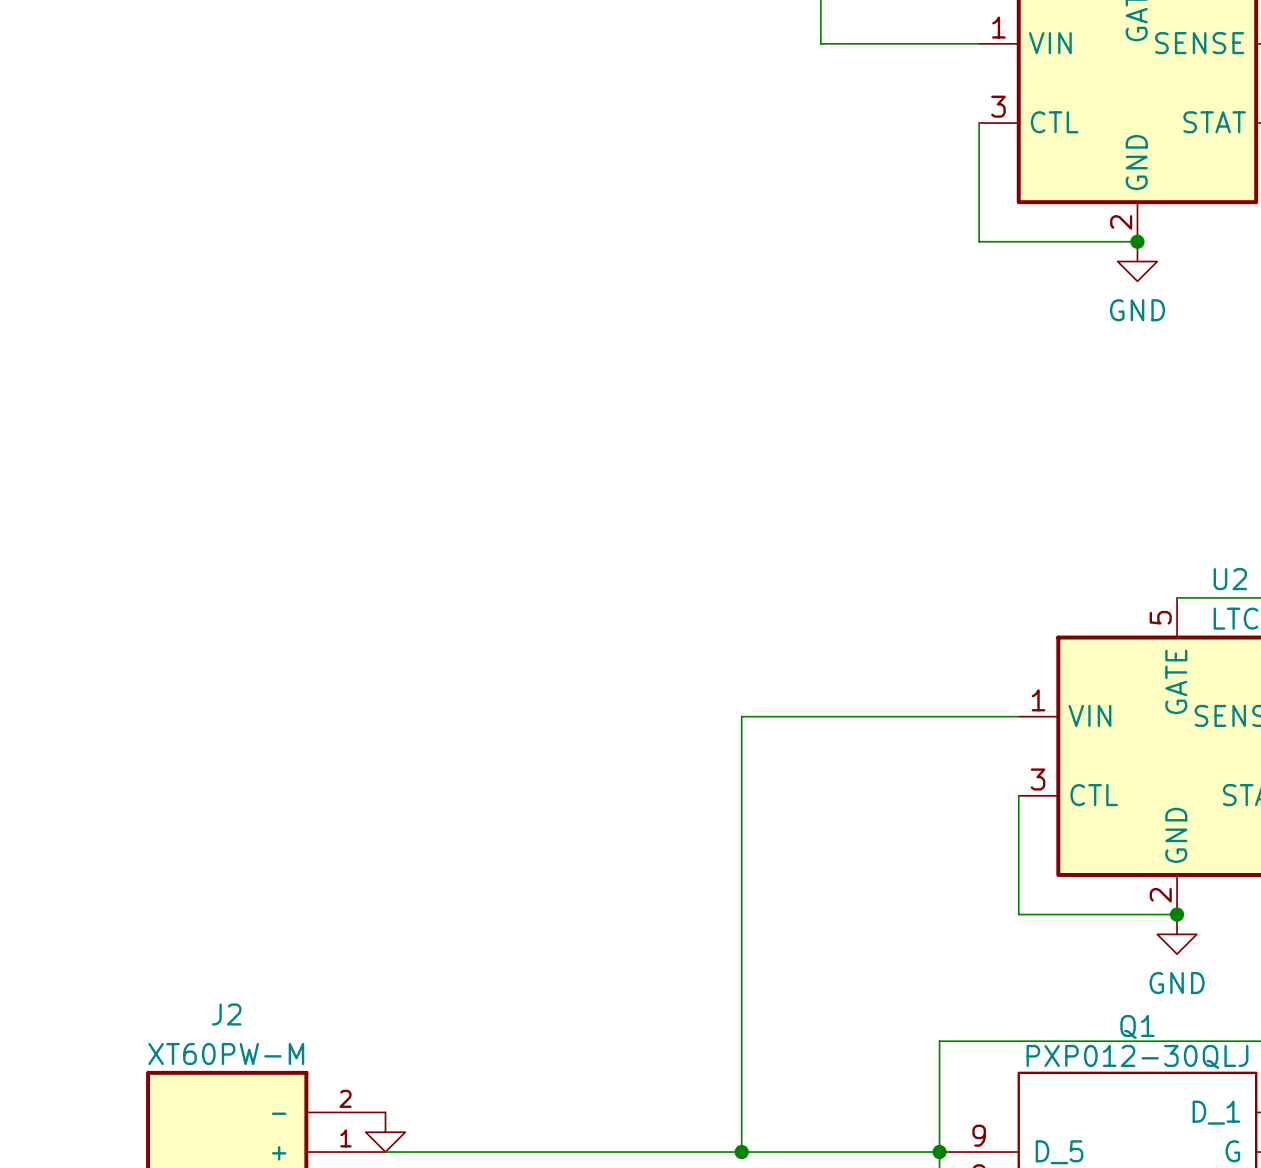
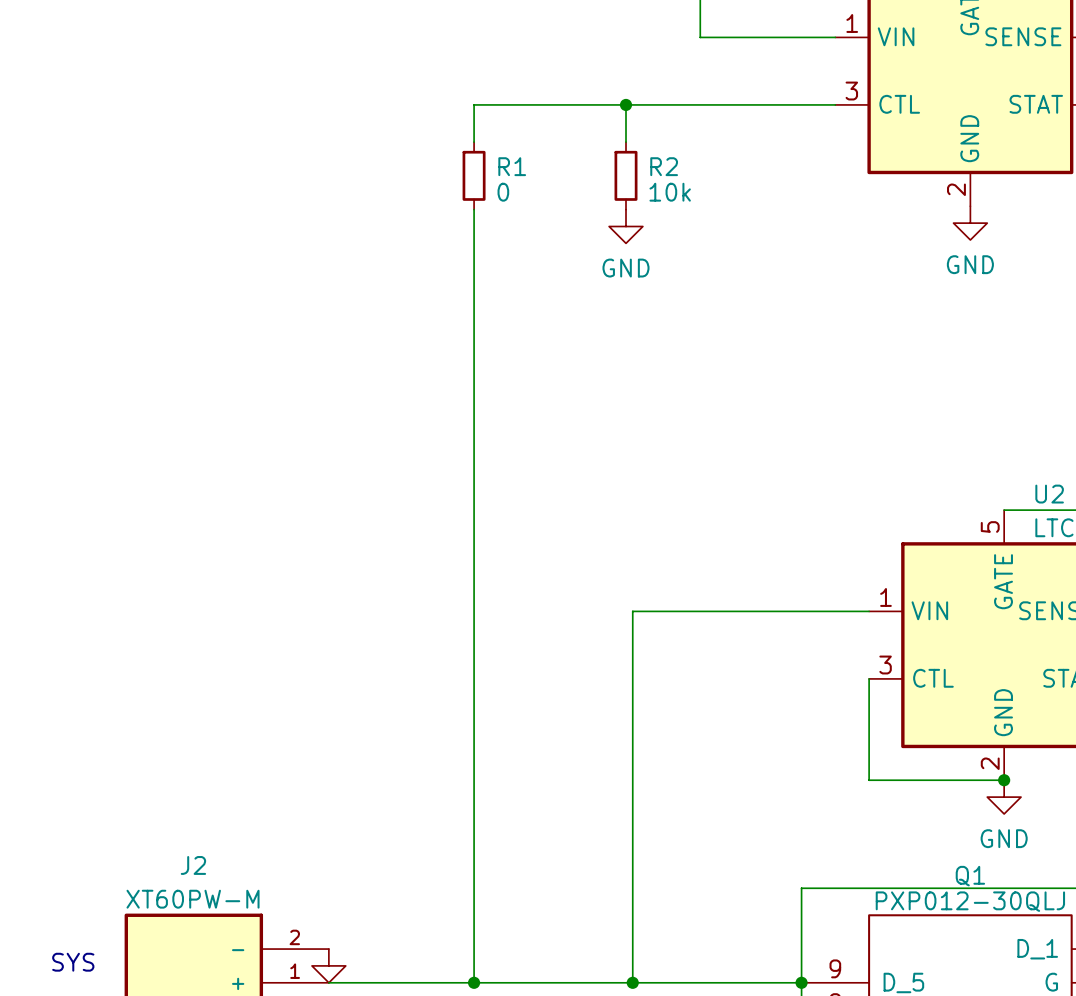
wire: none -> (626, 104) (626, 142)
junction: none -> (626, 104)
wire: (979, 123) (979, 241) (1137, 241) -> (835, 104) (474, 104) (474, 142)
R1: none -> 0 (474, 175)
R2: none -> 10k (626, 175)
junction: (1137, 241) -> none
wire: none -> (474, 209) (474, 982)
power symbol: none -> GND (626, 226)
text: none -> SYS (73, 962)
junction: none -> (474, 982)

